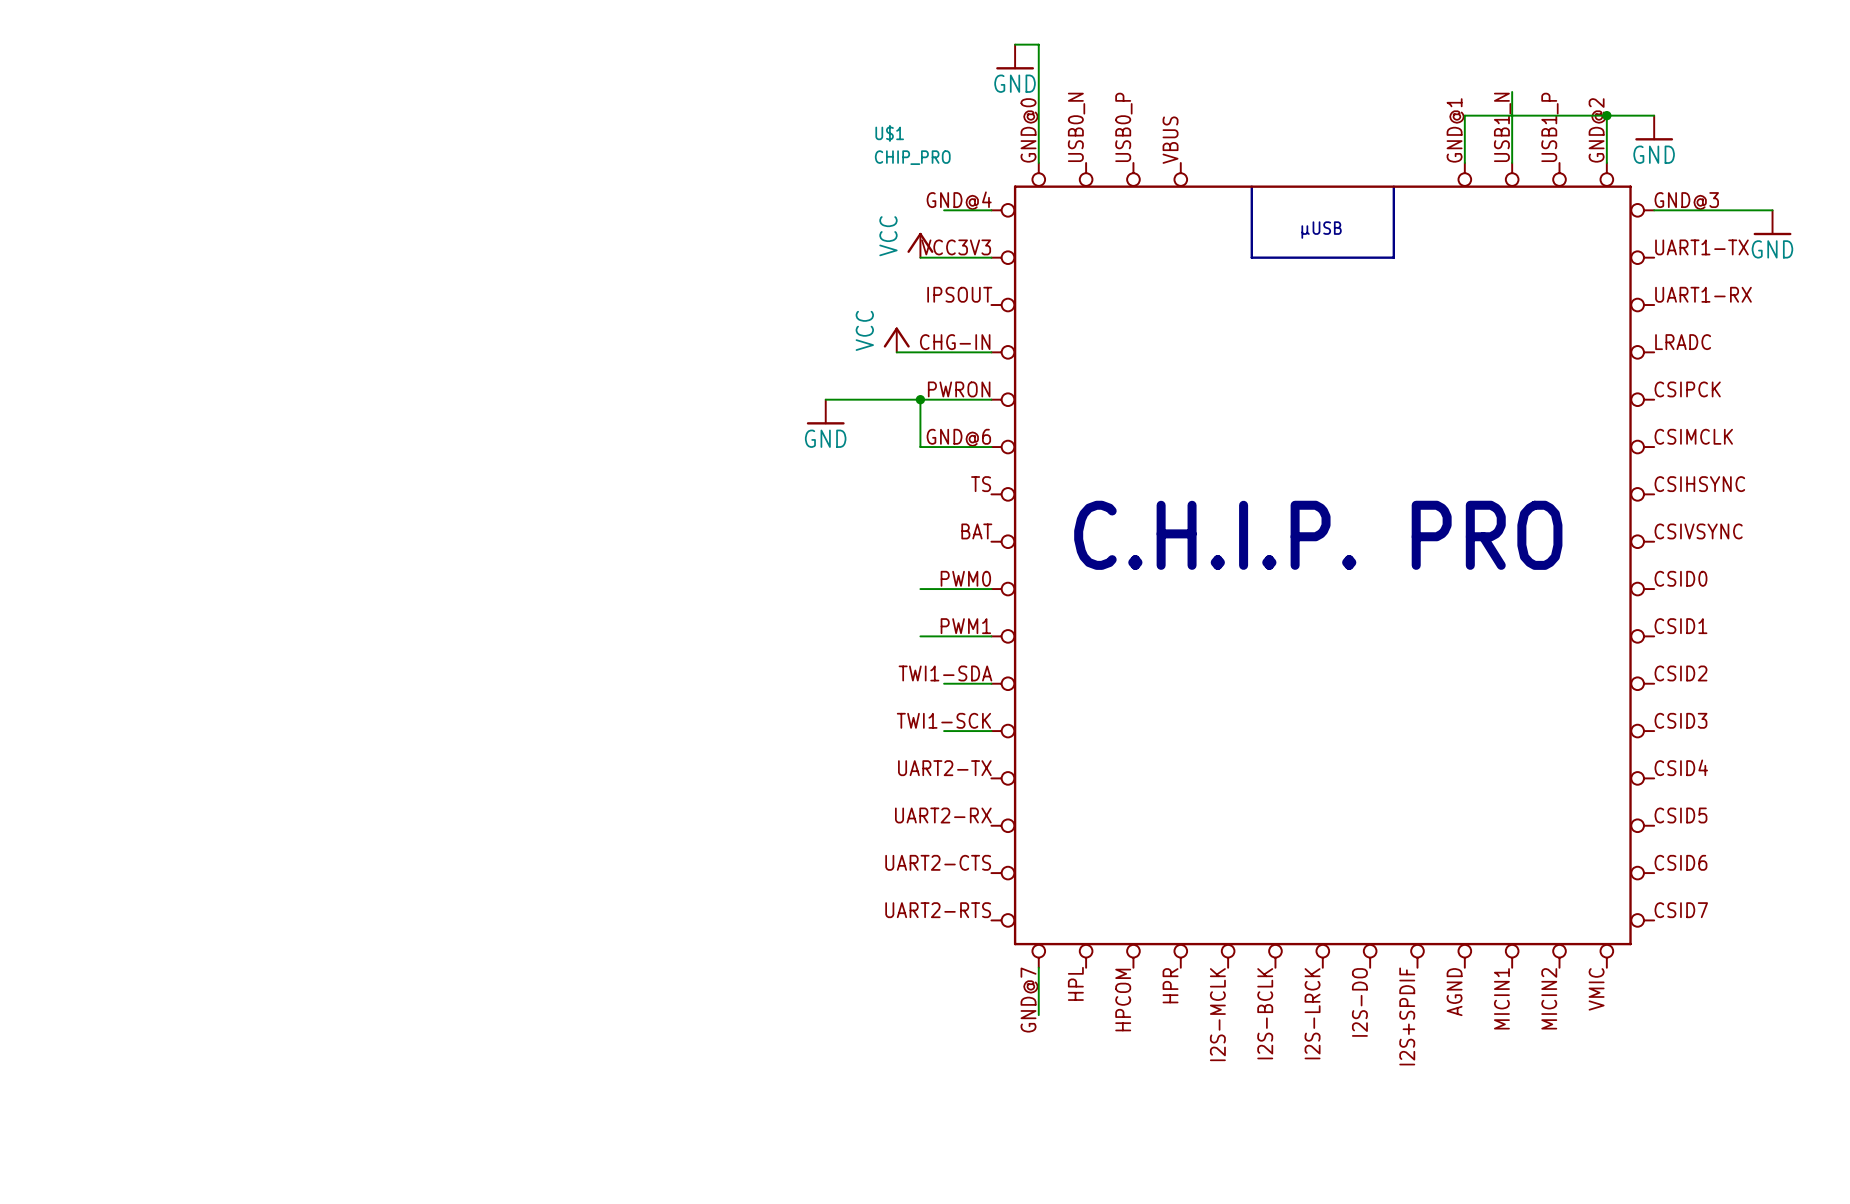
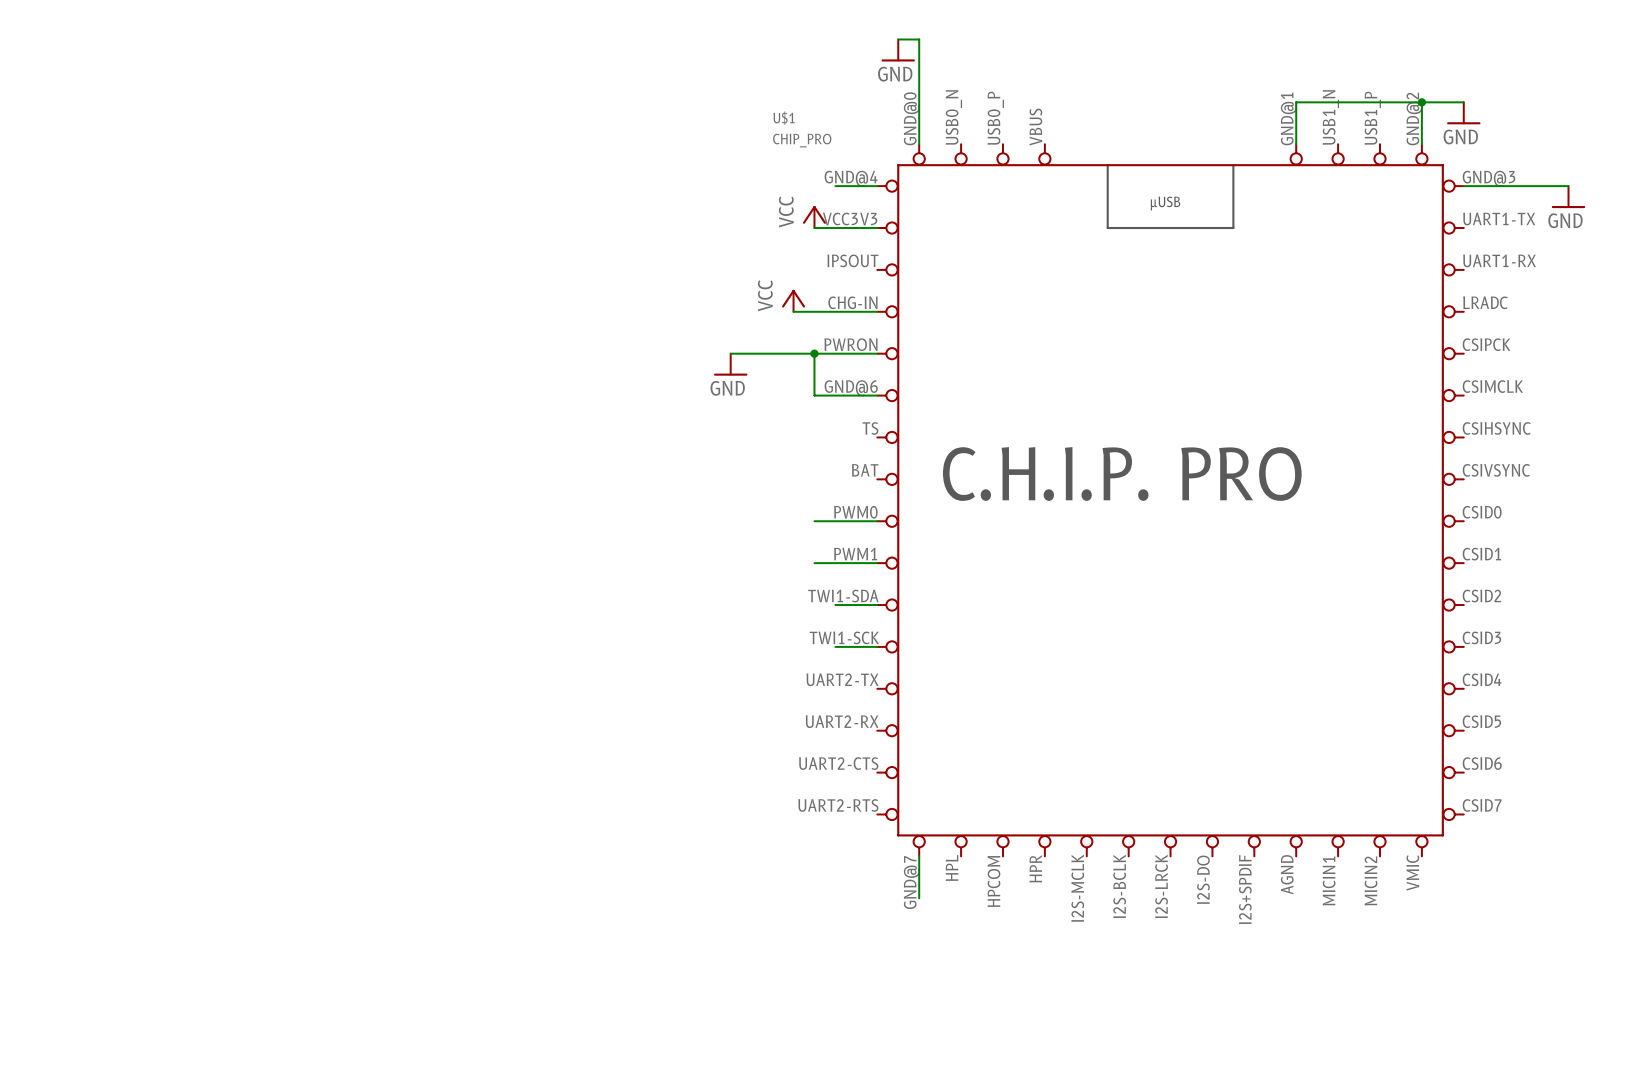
wire: (1512, 91) (1512, 162) -> none

